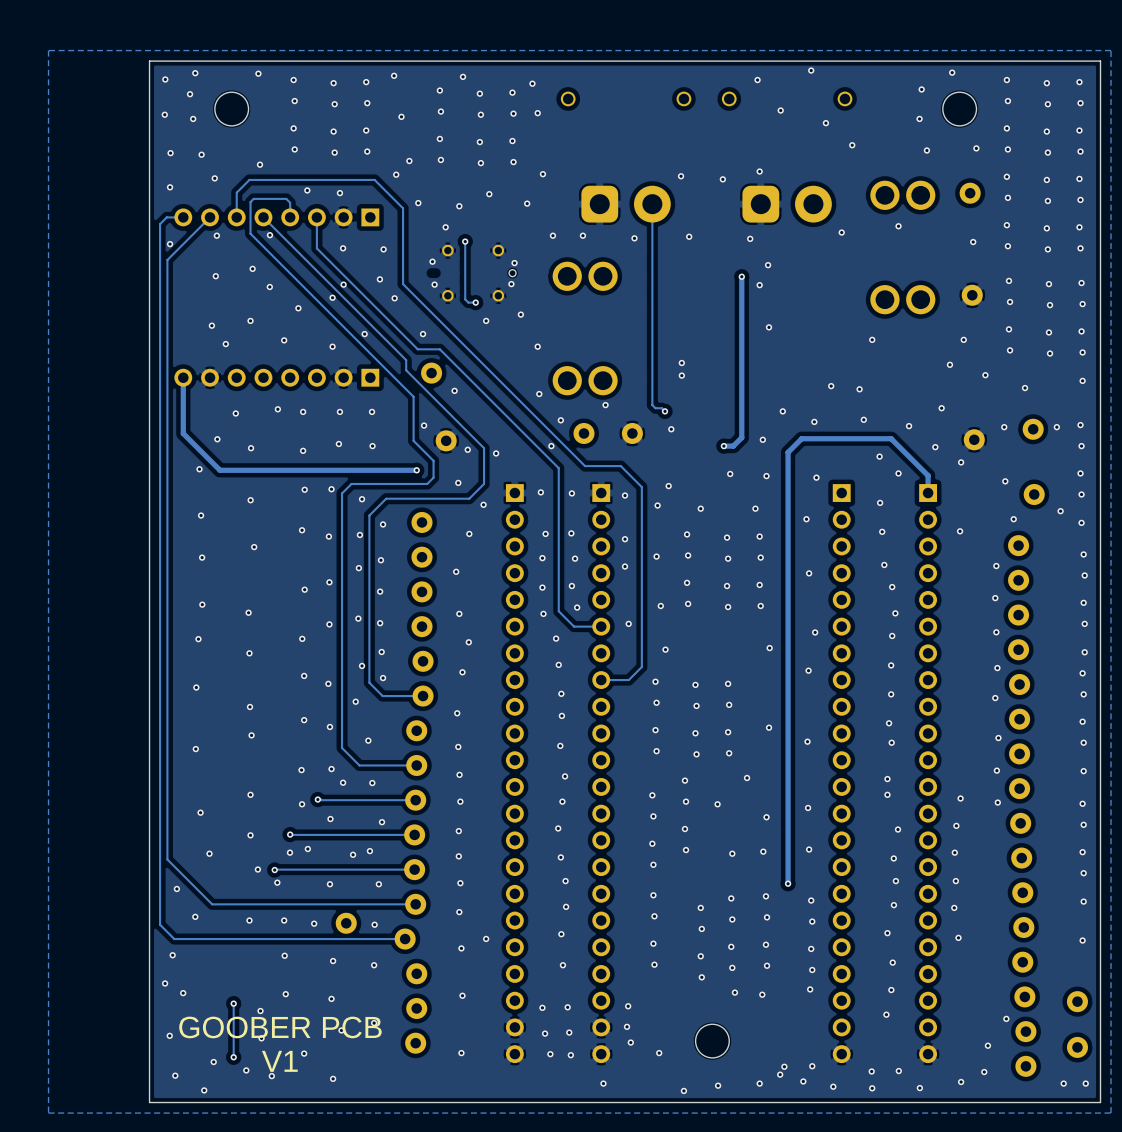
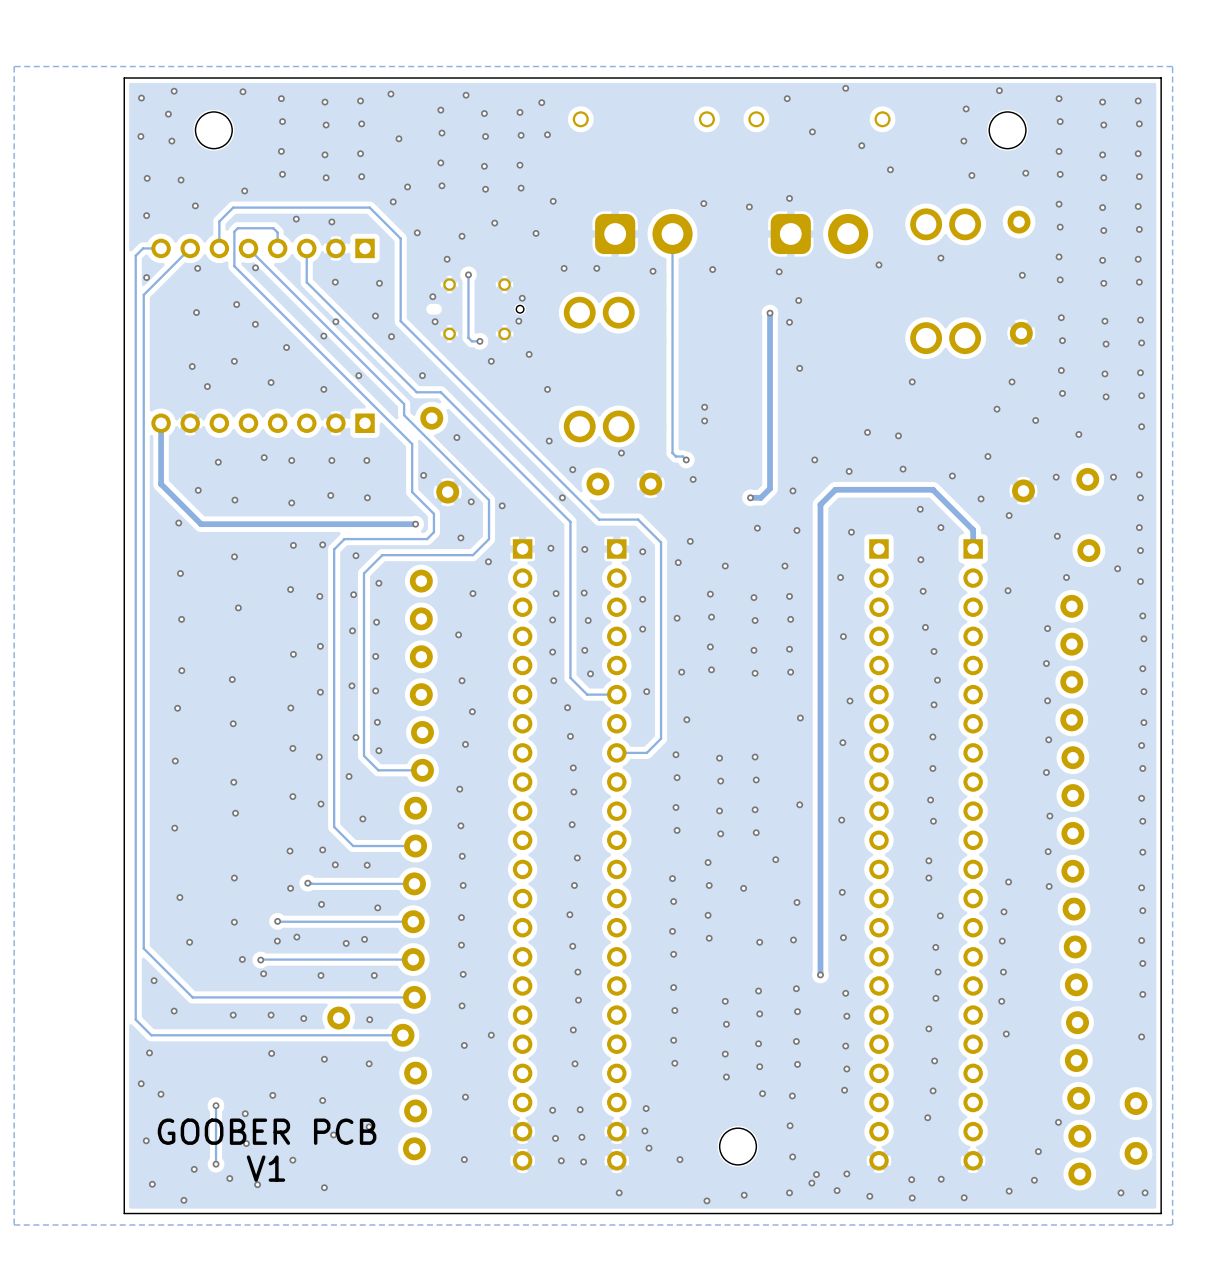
via: none -> (790, 1125)
via: none -> (792, 1156)

